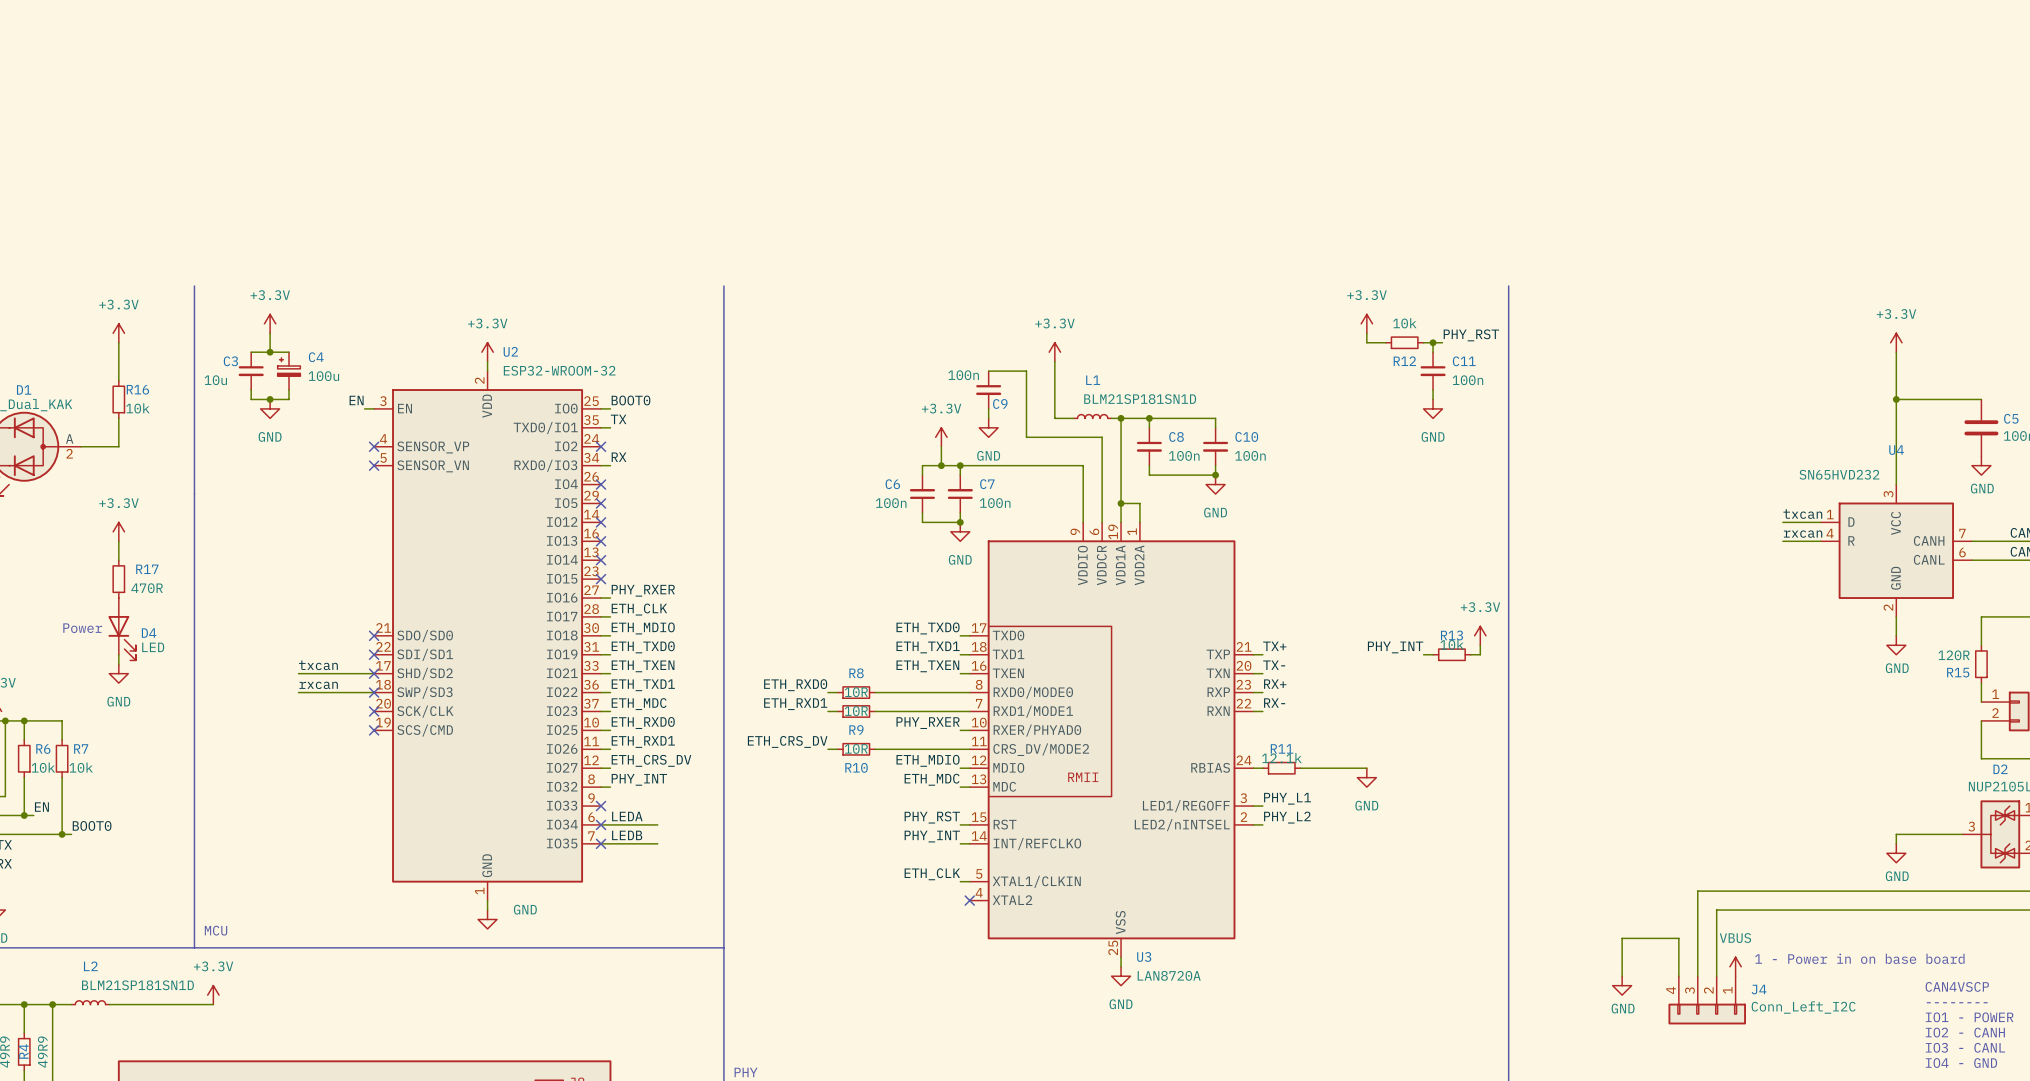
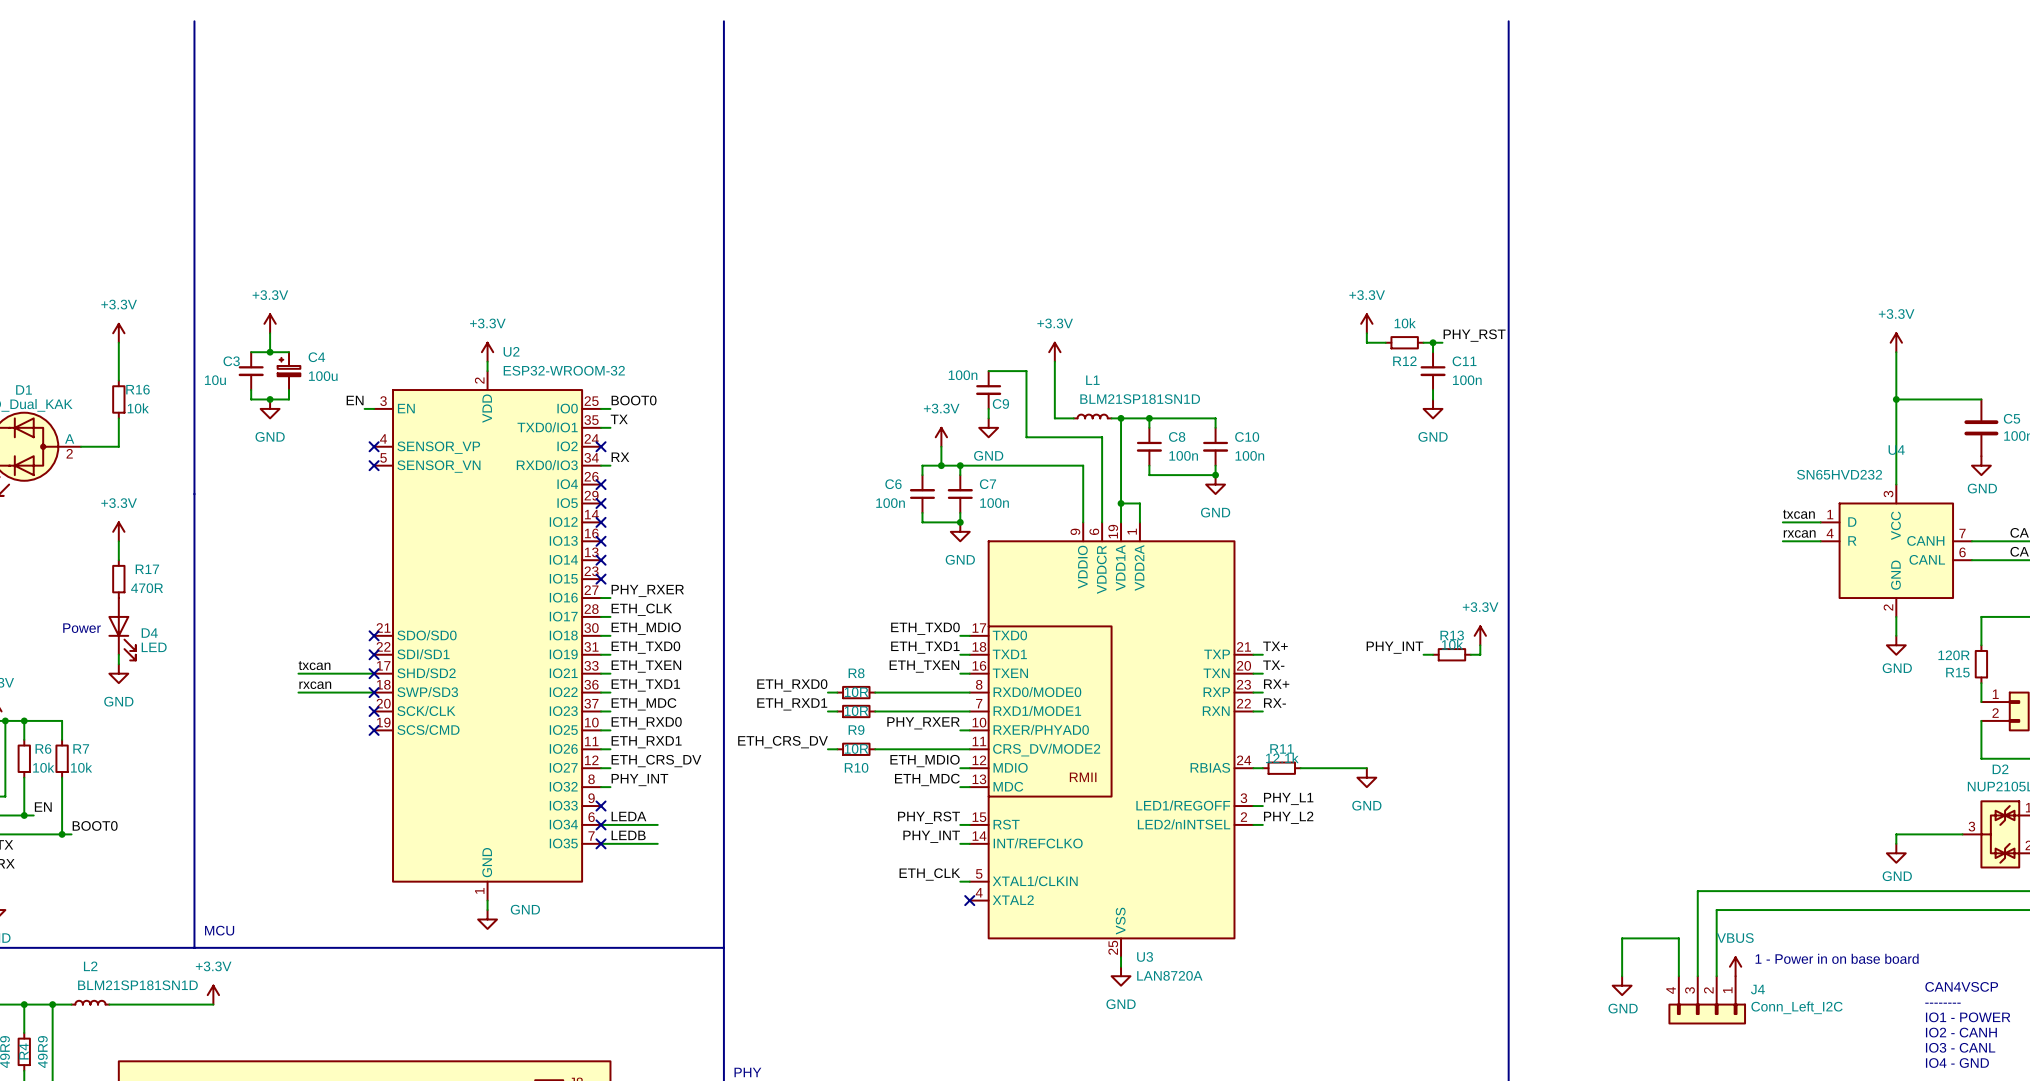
line: none -> (194, 21) (194, 286)
line: none -> (723, 21) (723, 286)
line: none -> (1508, 21) (1508, 286)

